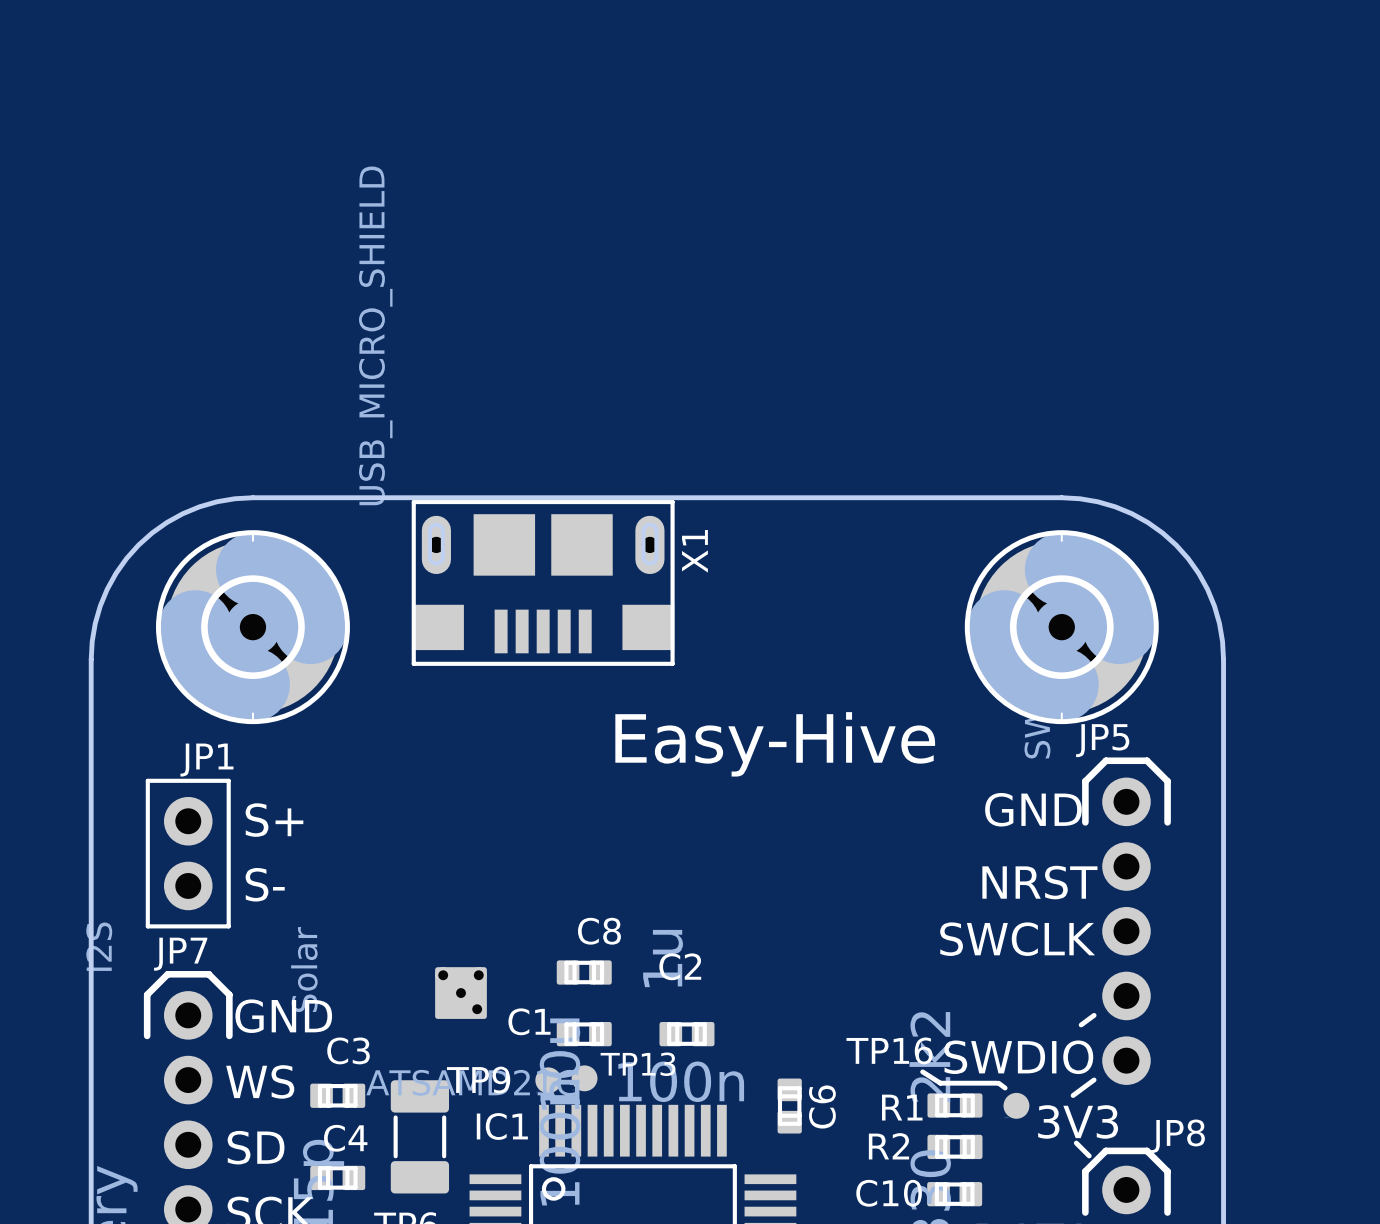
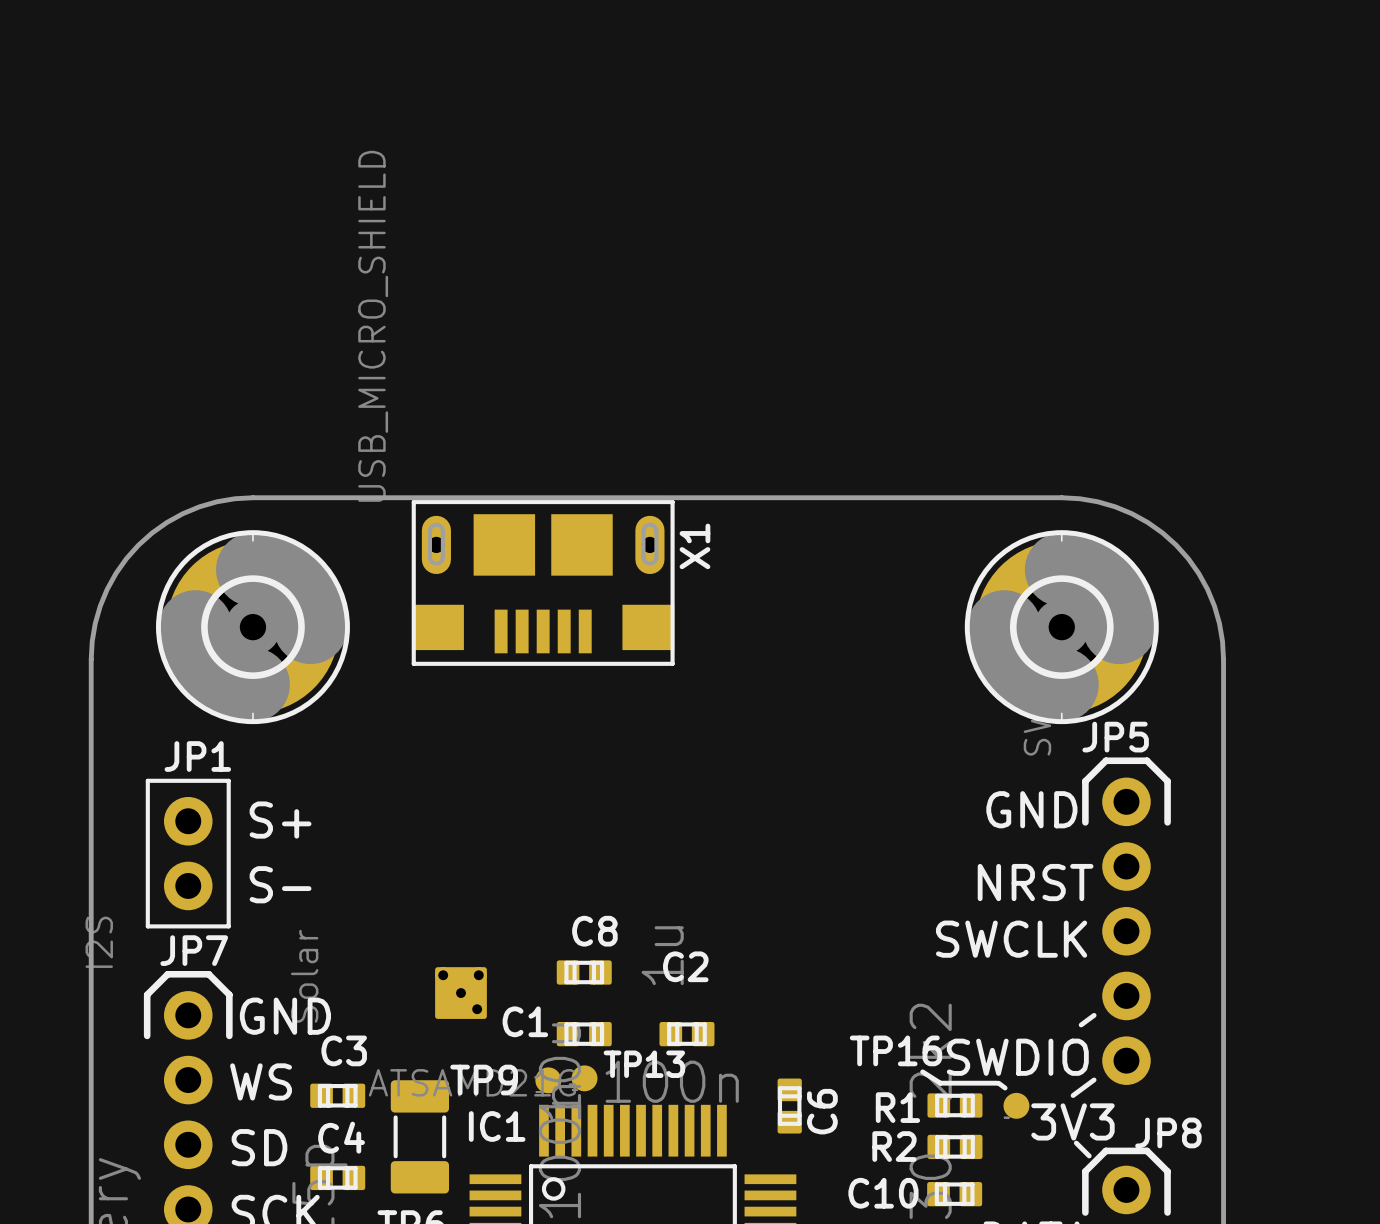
text: Easy-Hive (775, 744) -> none

